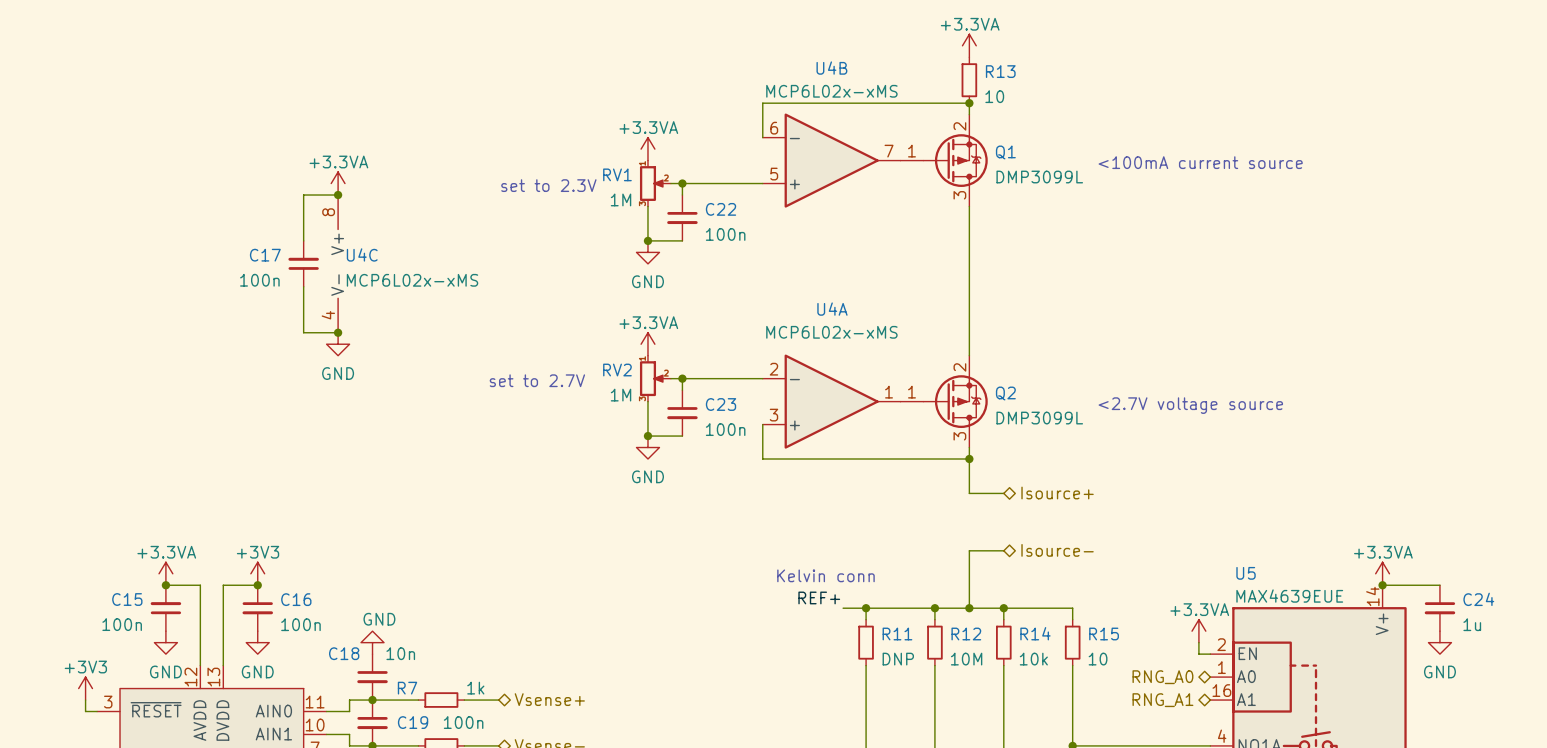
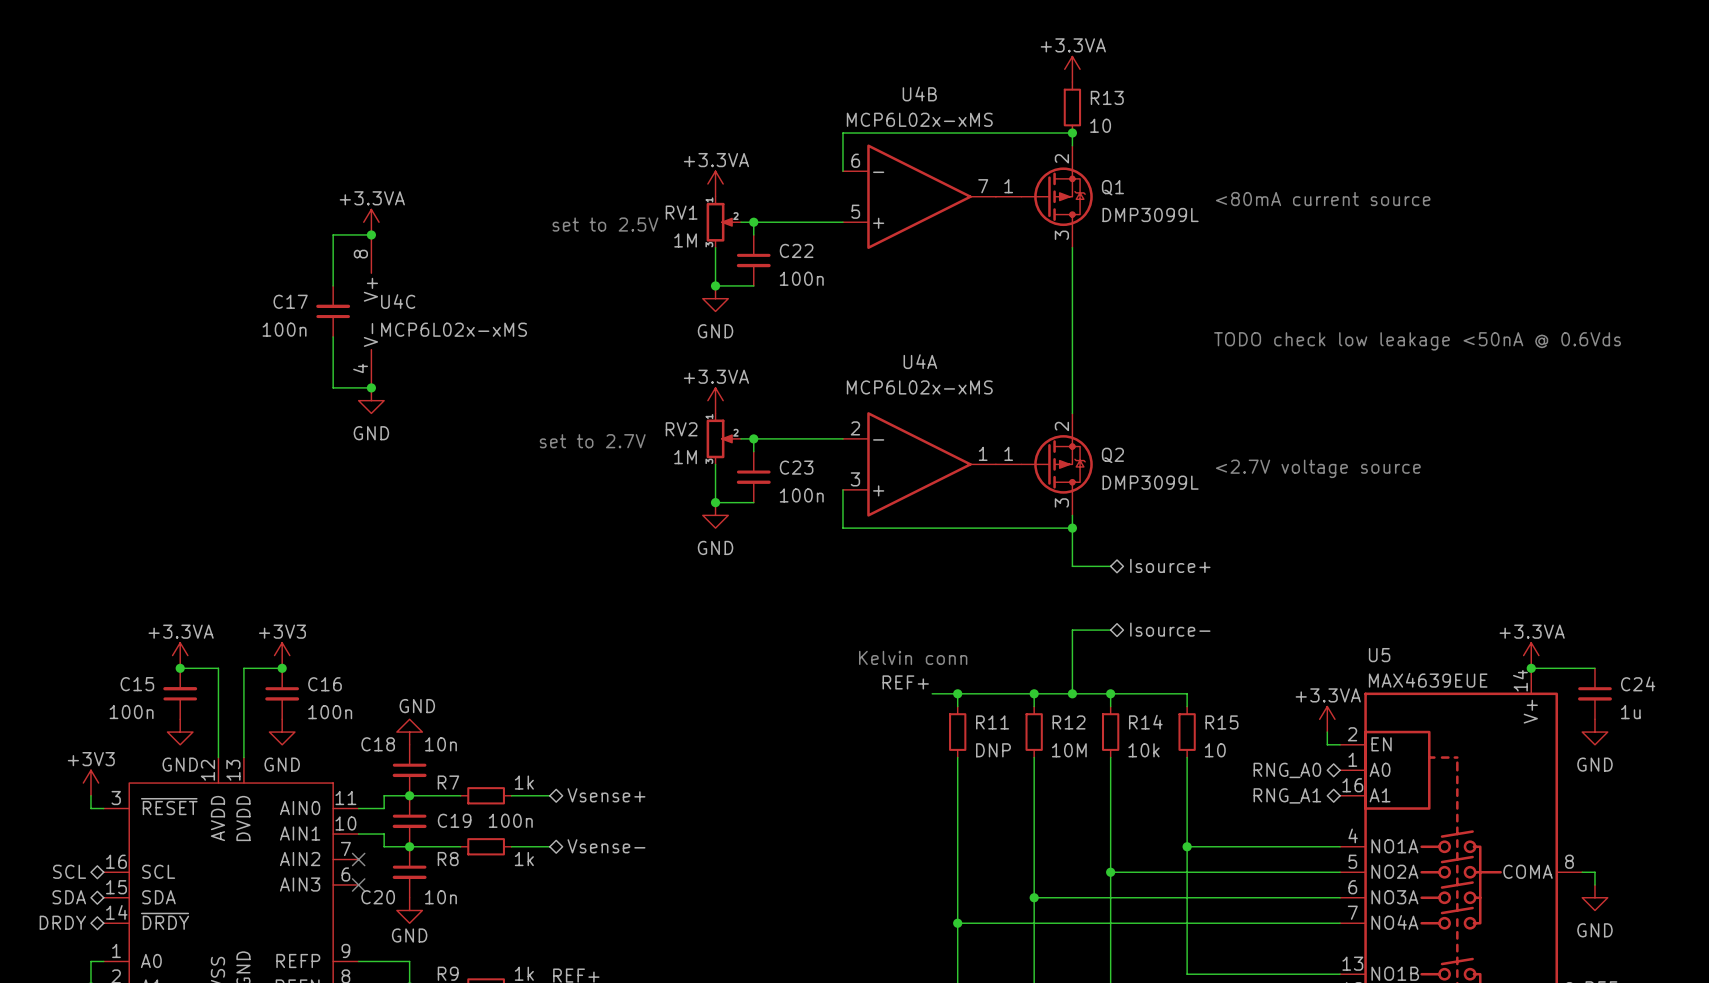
text: <100mA current source (1200, 162) -> <80mA current source (1323, 199)
text: set to 2.3V (548, 185) -> set to 2.5V (605, 224)
text: none -> TODO check low leakage <50nA @ 0.6Vds (1417, 341)

